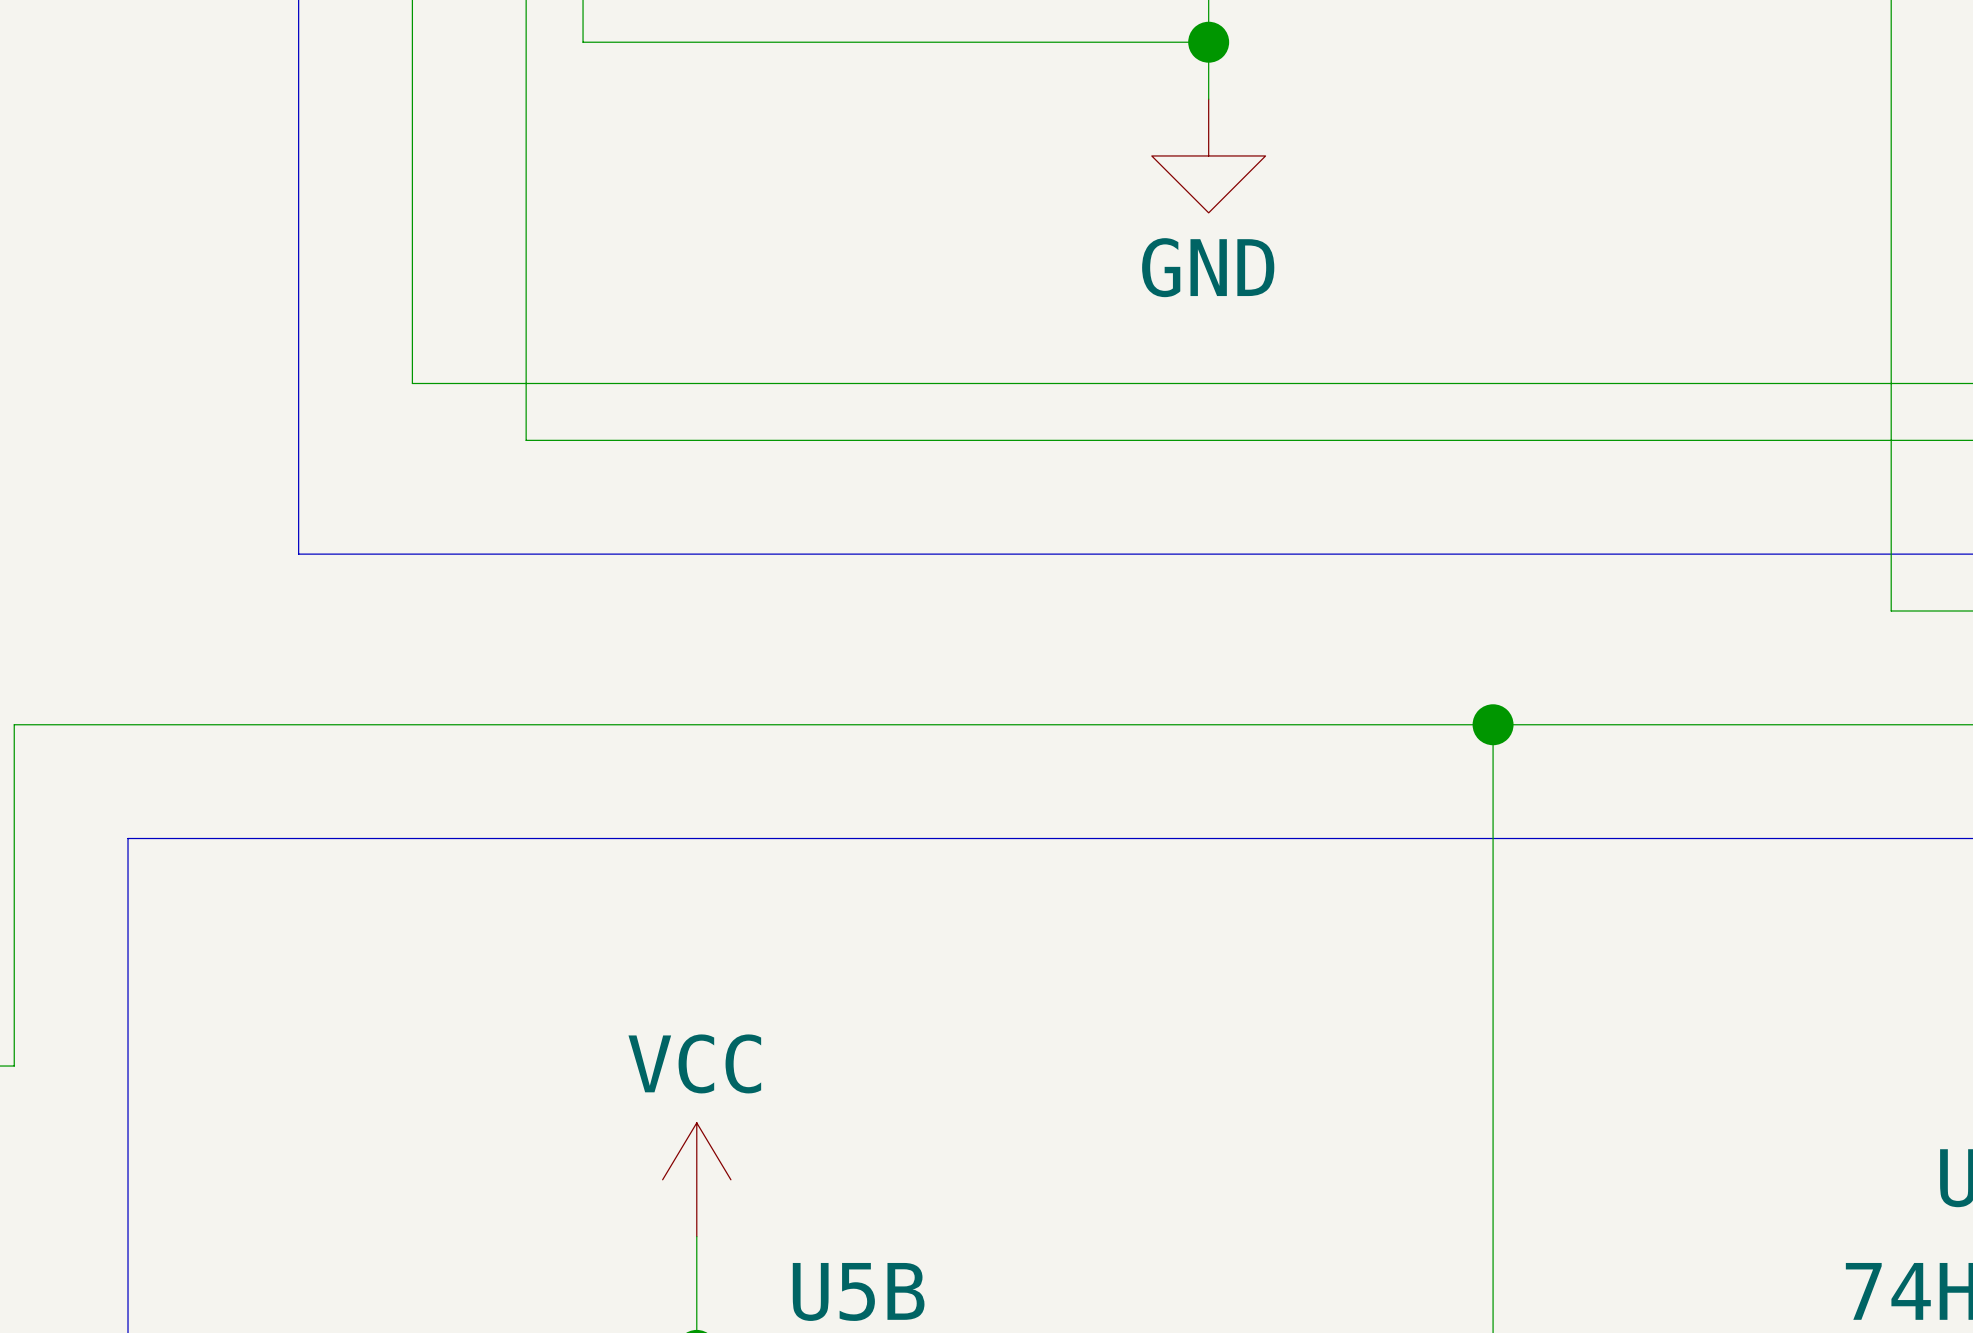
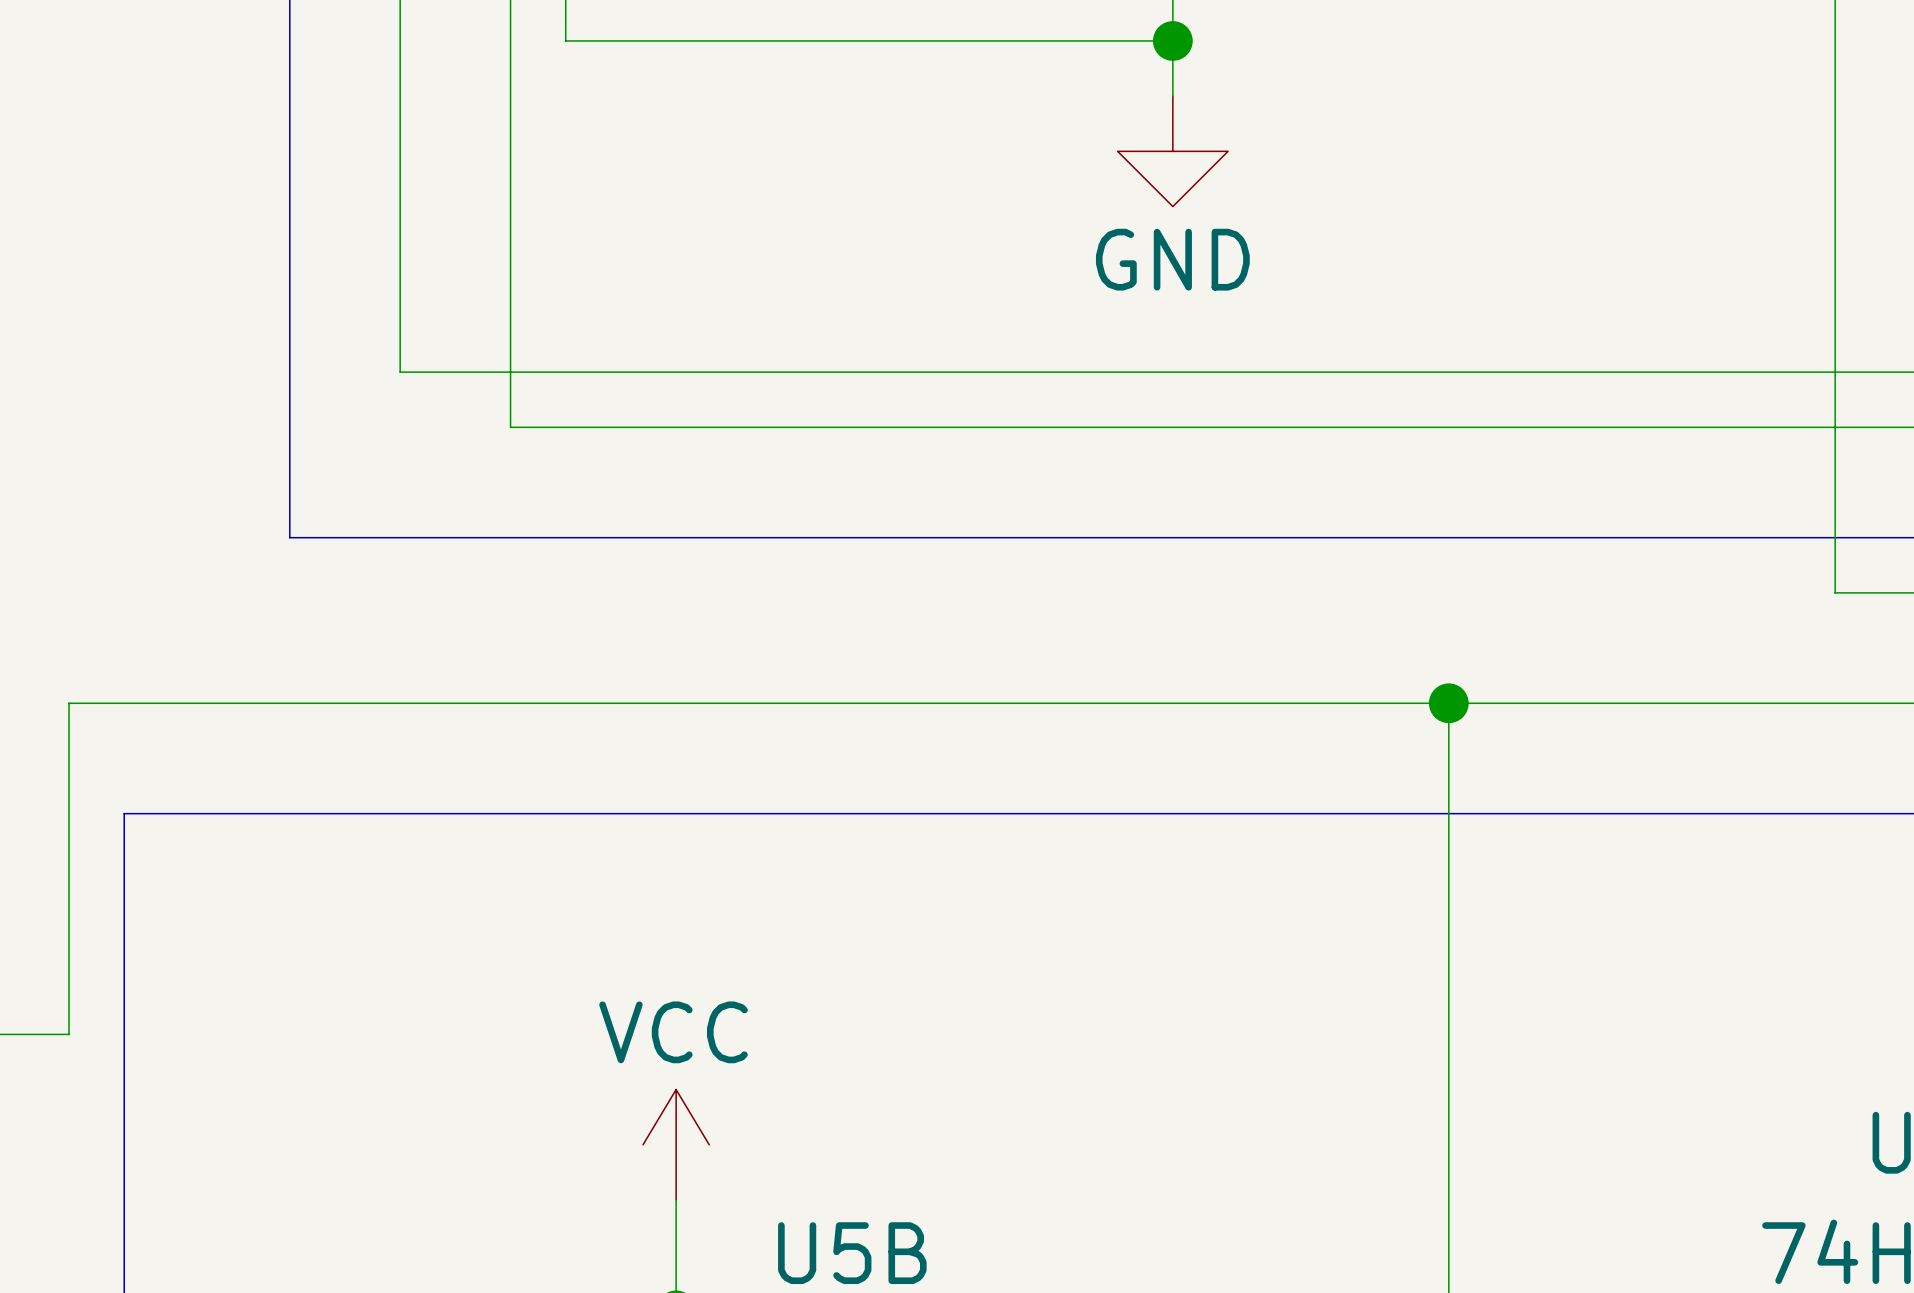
wire: (71, 724) (14, 724) (14, 1066) -> (69, 703) (69, 1034) (13, 1034)

